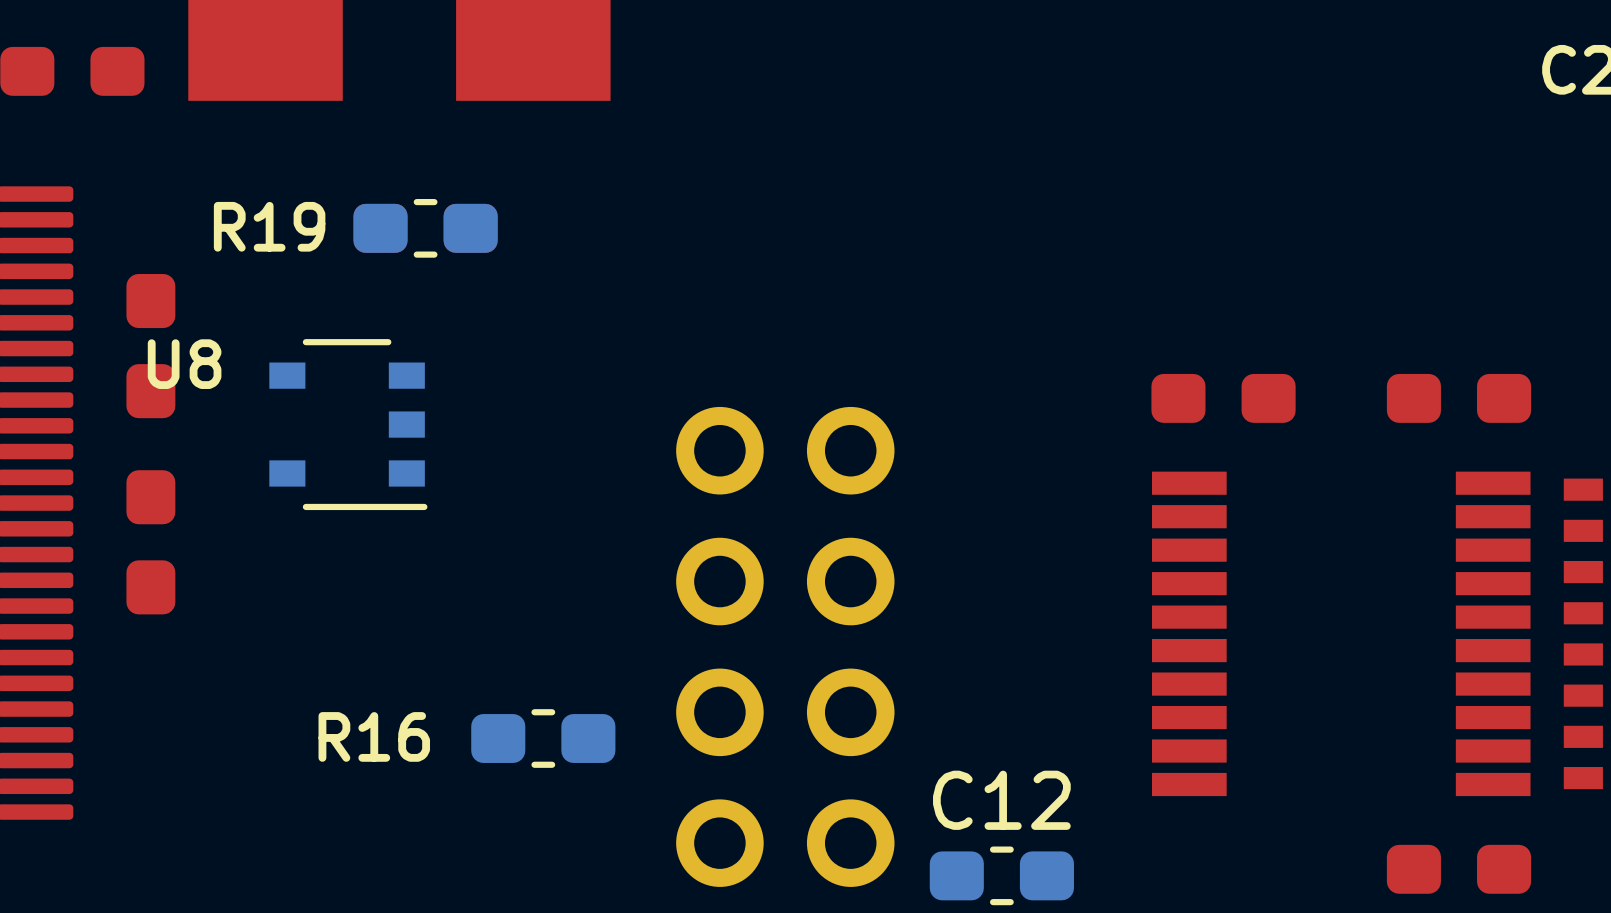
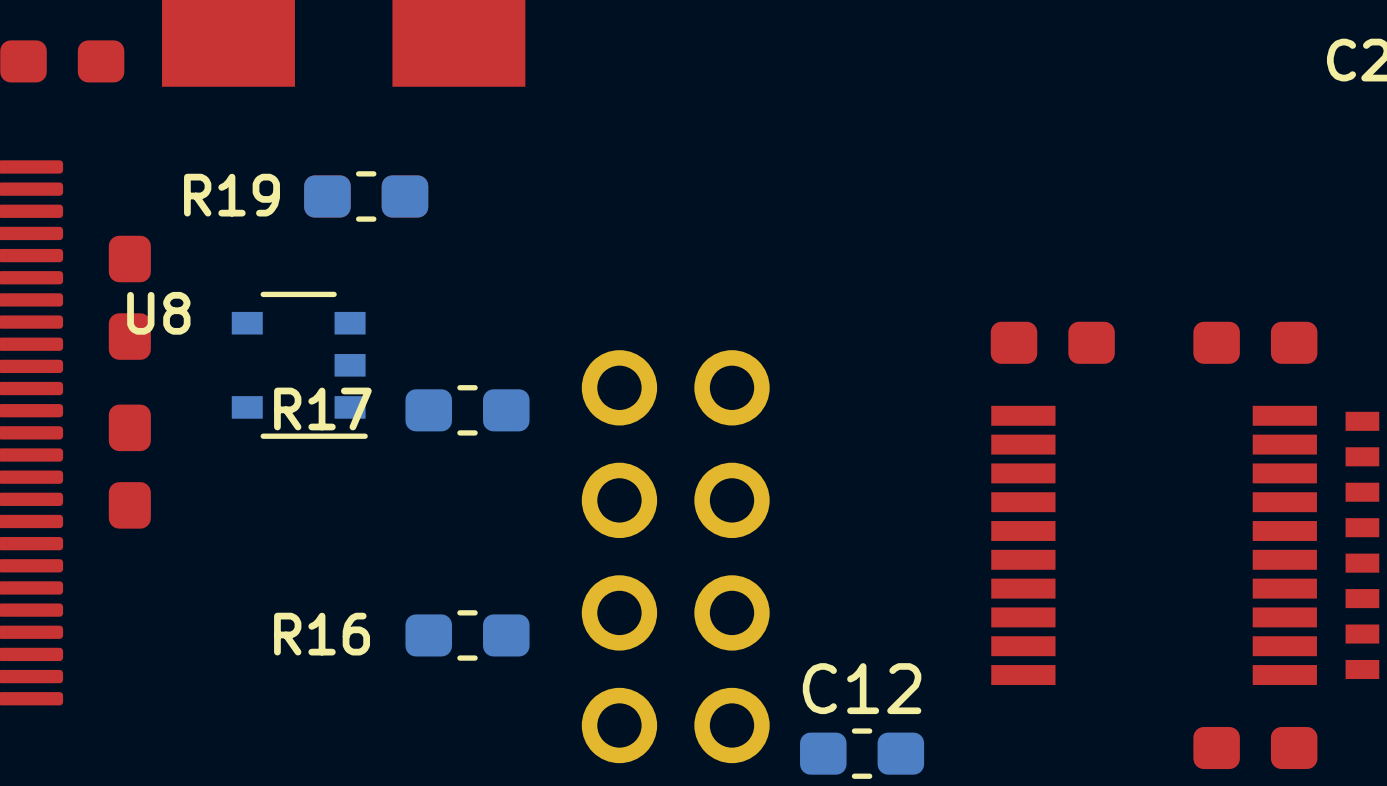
R17: none -> (467, 410)

